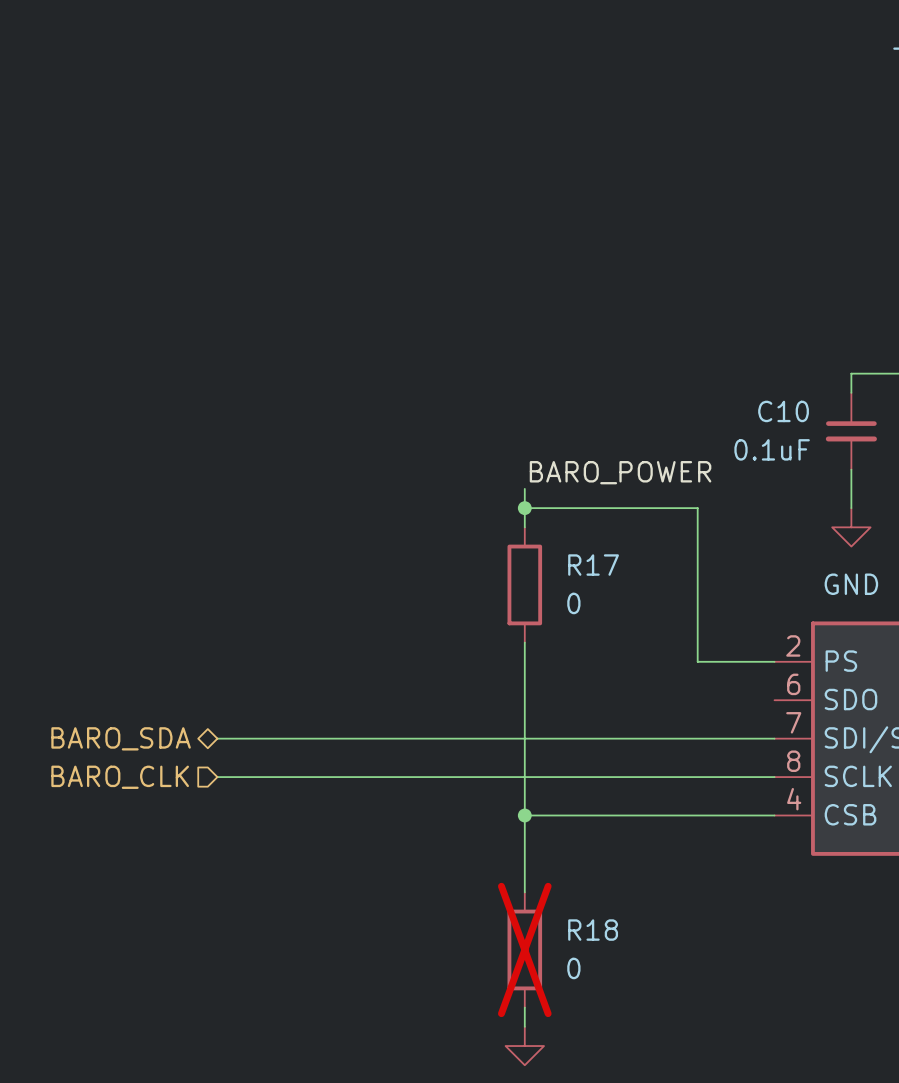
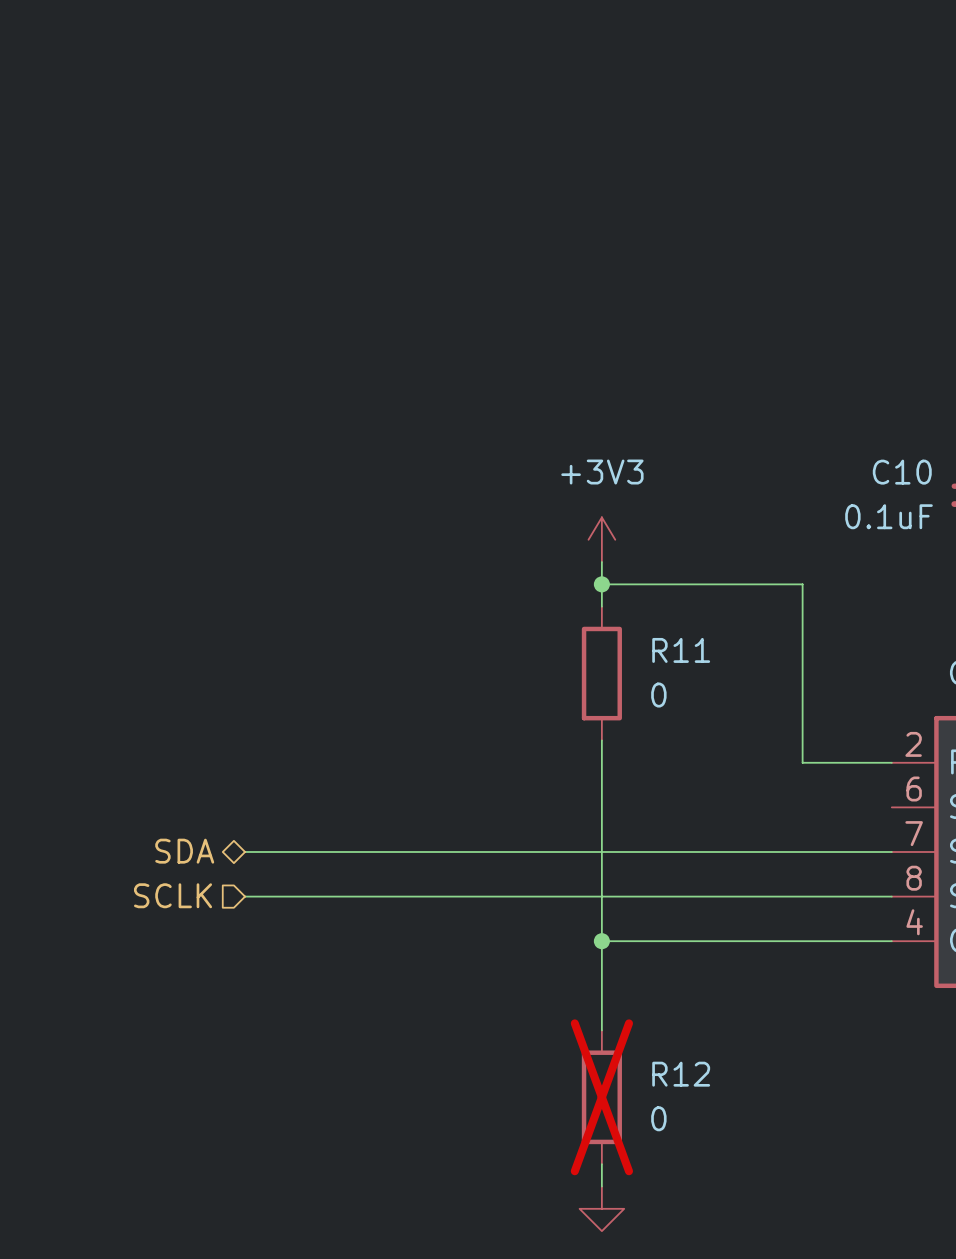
power symbol: none -> +3V3 (601, 539)
label: BARO_POWER (620, 472) -> none
R17 name: R17 (593, 565) -> R11 (681, 650)
hierarchical label: BARO_SDA (121, 738) -> SDA (184, 851)
hierarchical label: BARO_CLK (120, 777) -> SCLK (173, 895)
R18 name: R18 (593, 930) -> R12 (681, 1074)

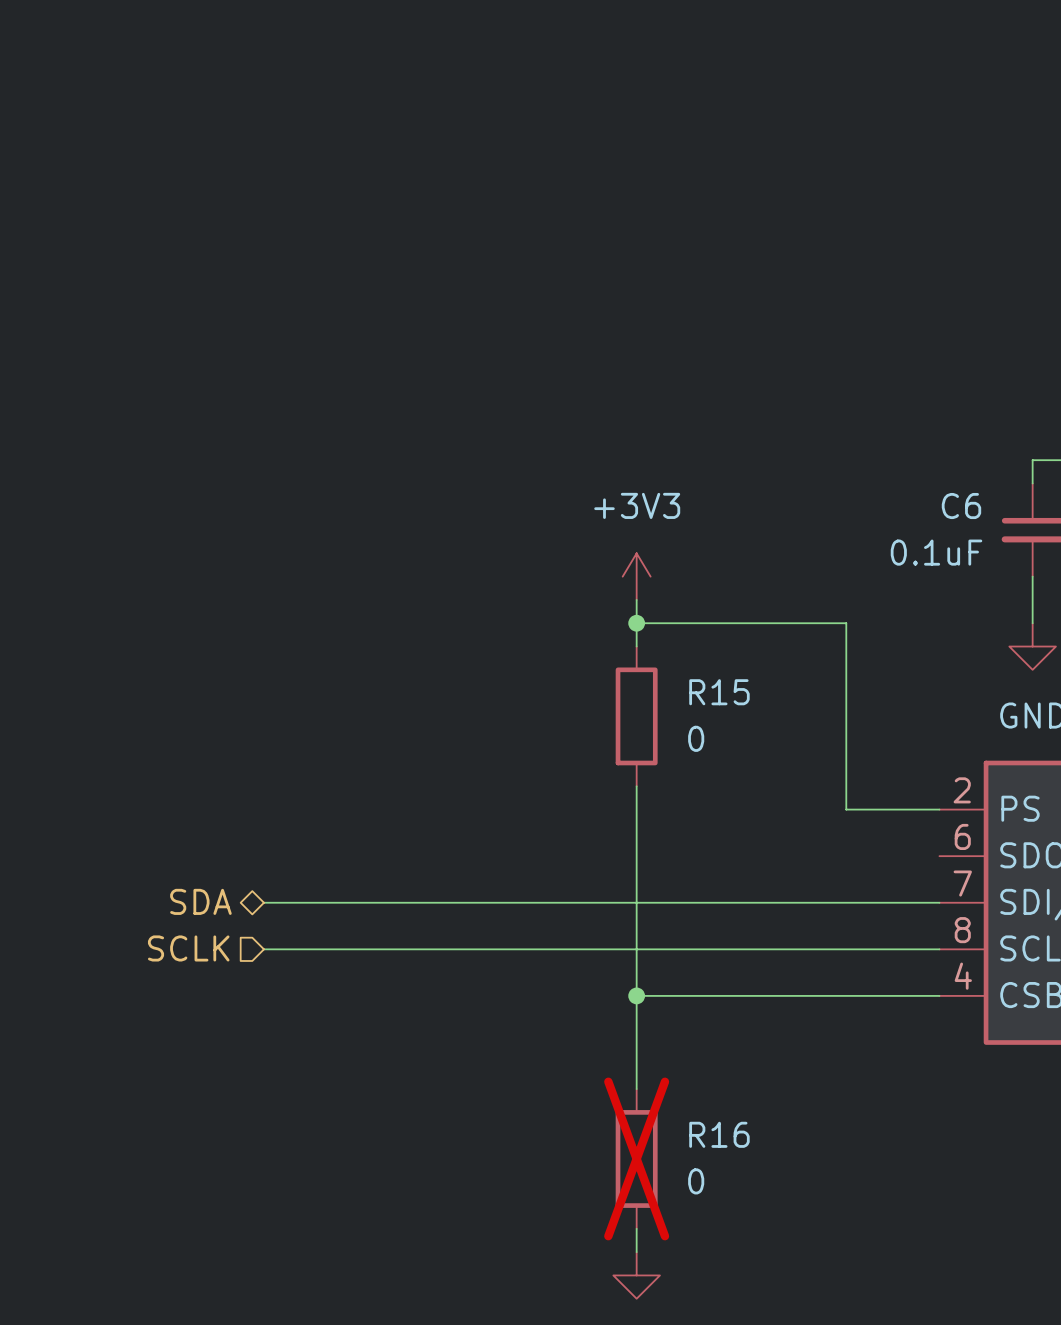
C10 name: C10 (902, 472) -> C6 (961, 506)
R11 name: R11 (681, 650) -> R15 (719, 692)
R12 name: R12 (681, 1074) -> R16 (719, 1134)

